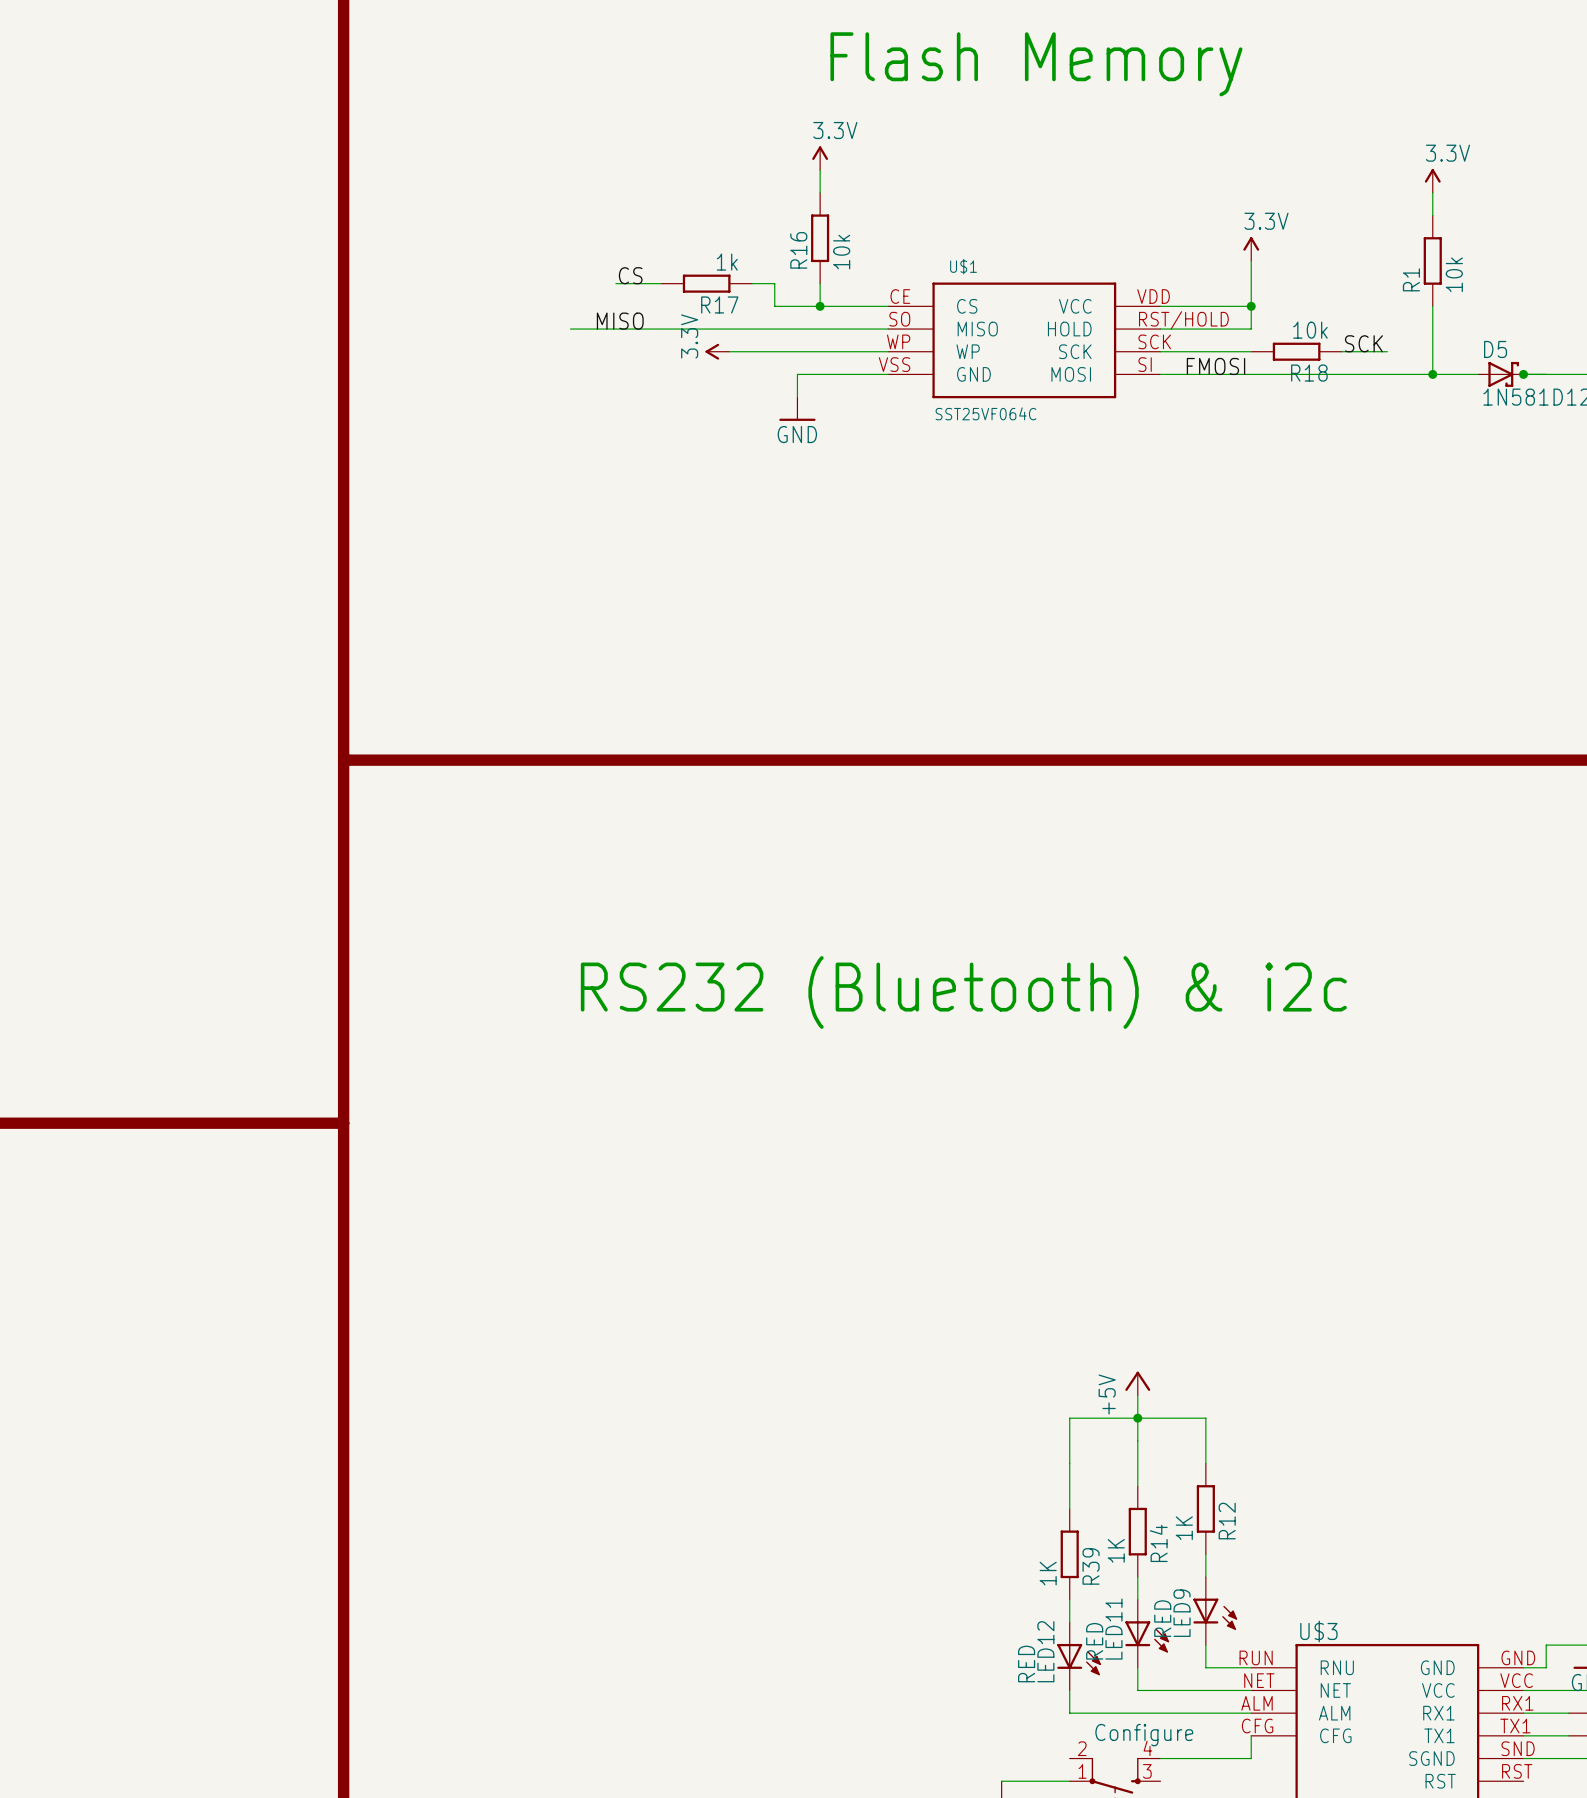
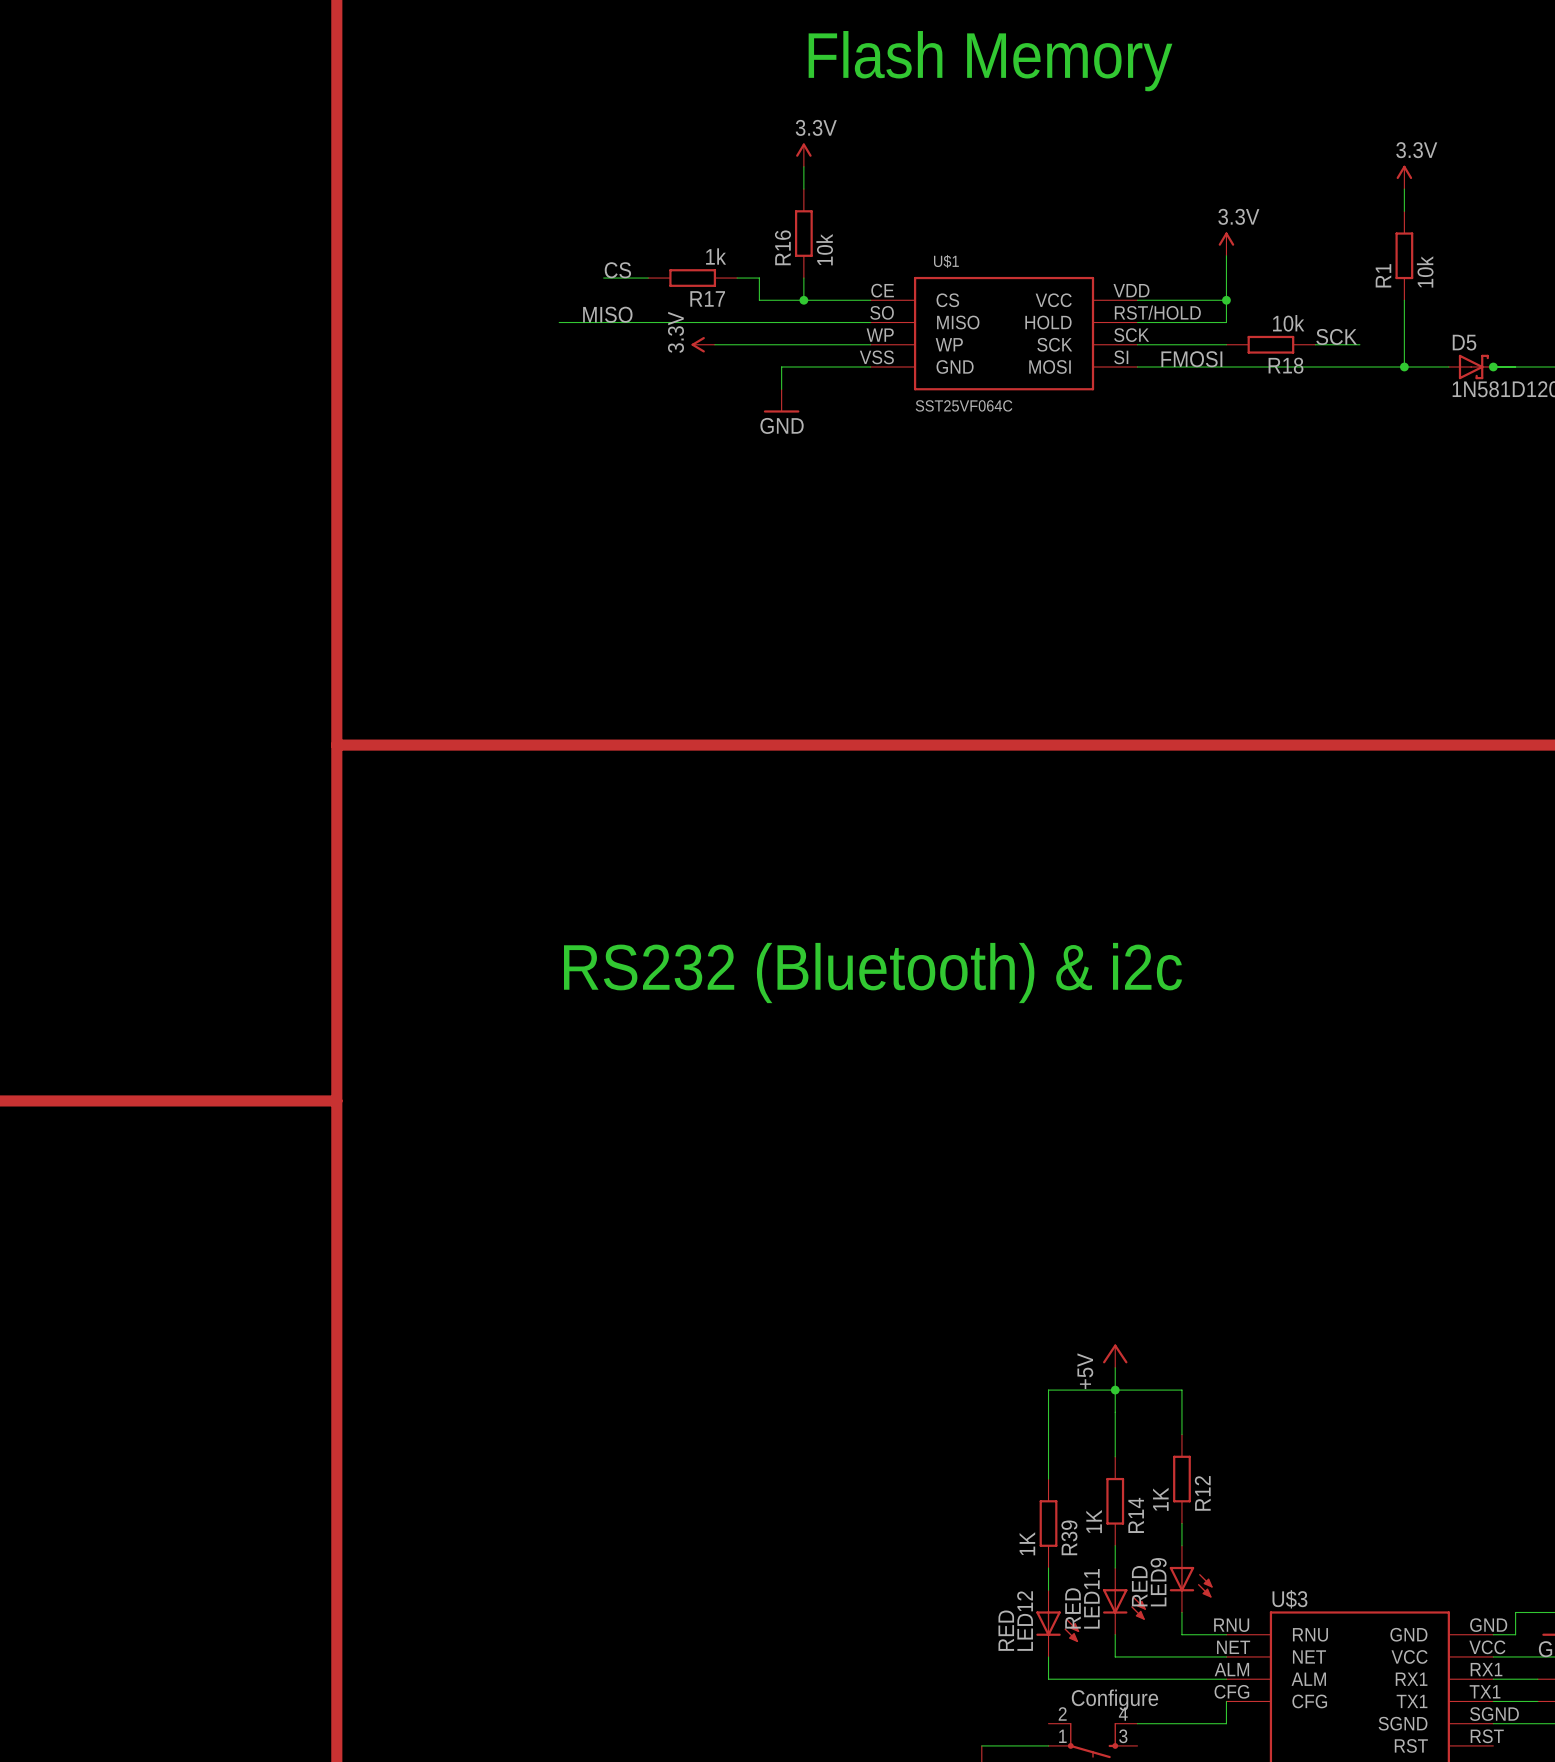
U$3 pin number: RUN (1256, 1657) -> RNU (1231, 1625)
U$3 pin number: SND (1518, 1748) -> SGND (1494, 1714)

